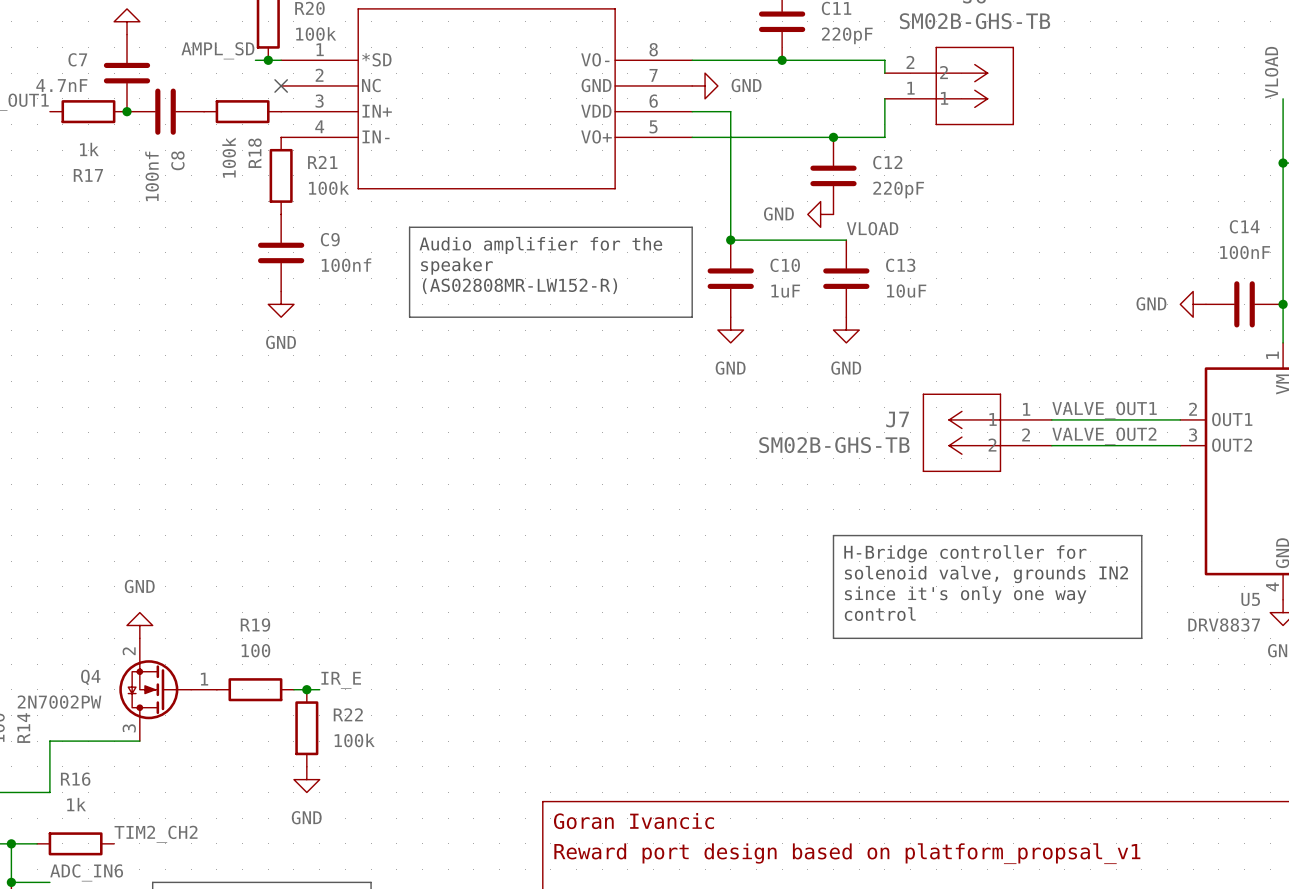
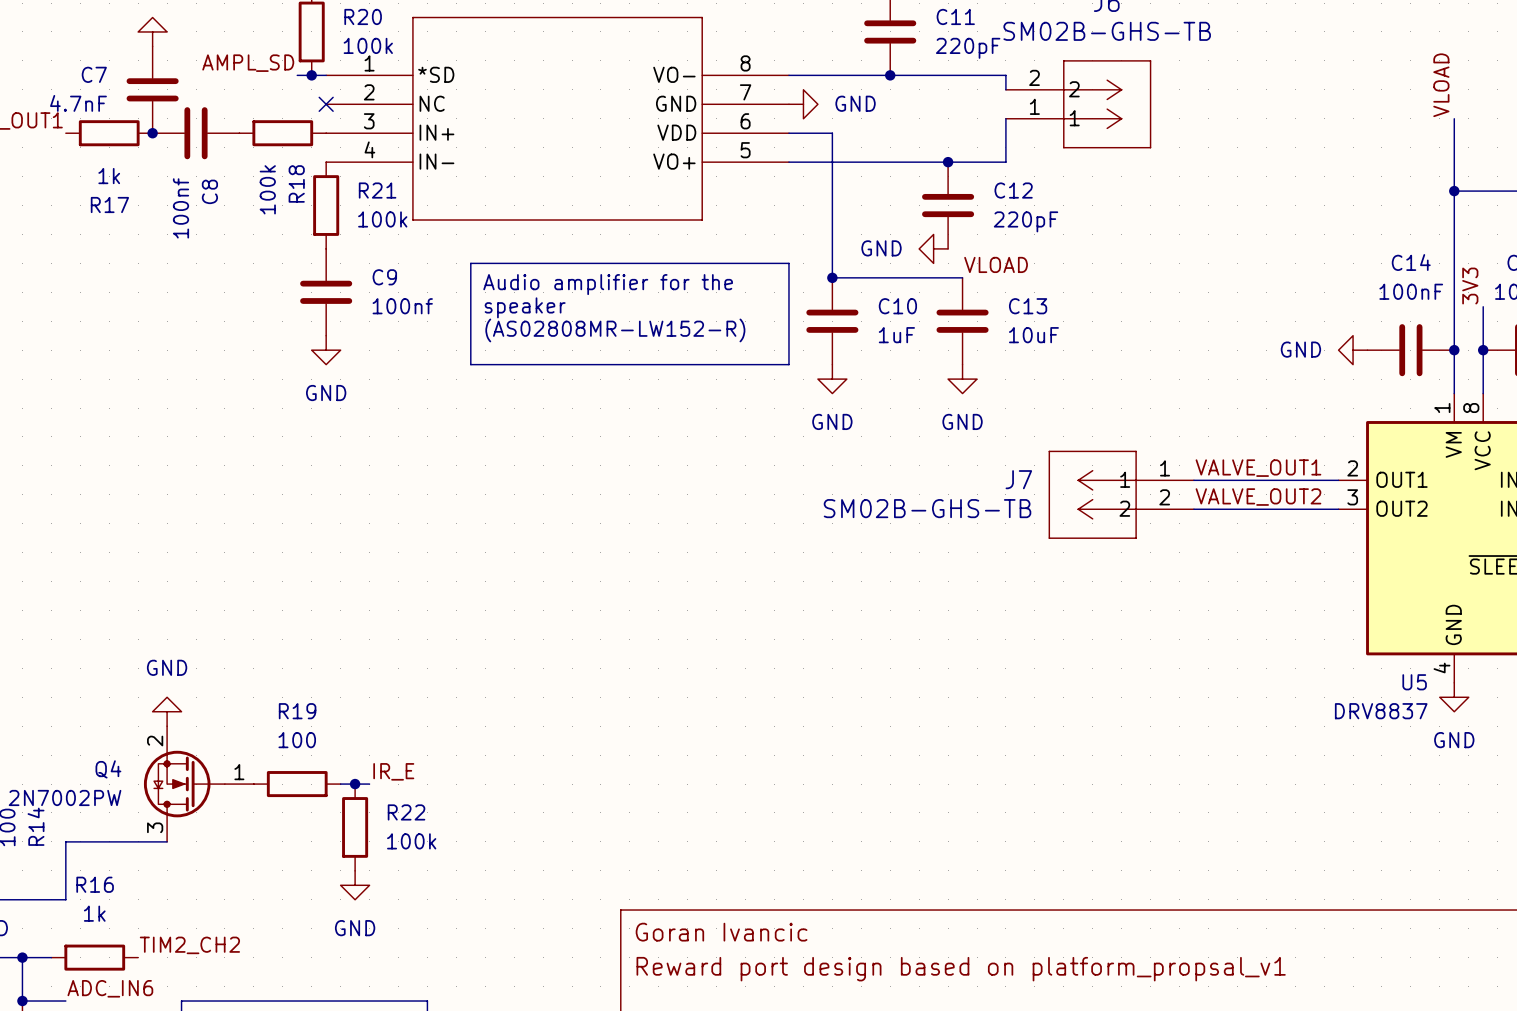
line: (833, 535) (1141, 535) (1141, 638) (833, 638) (833, 535) -> none
text: H-Bridge controller for (965, 553) -> none
text: solenoid valve, grounds IN2 (986, 574) -> none
text: since it's only one way (965, 595) -> none
text: control (880, 614) -> none

